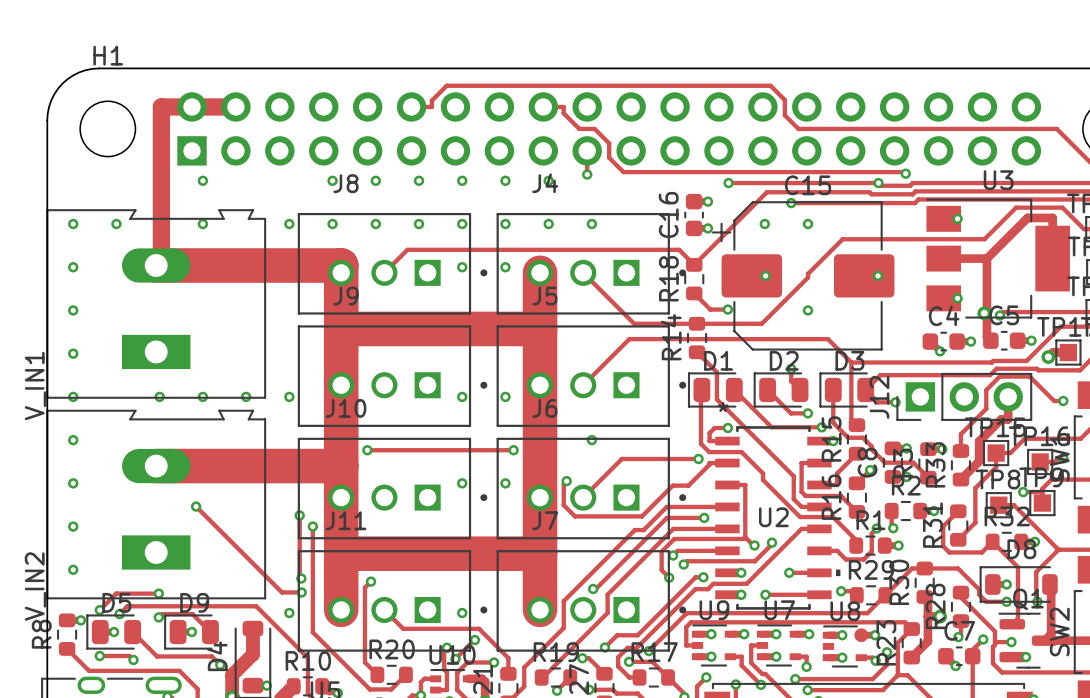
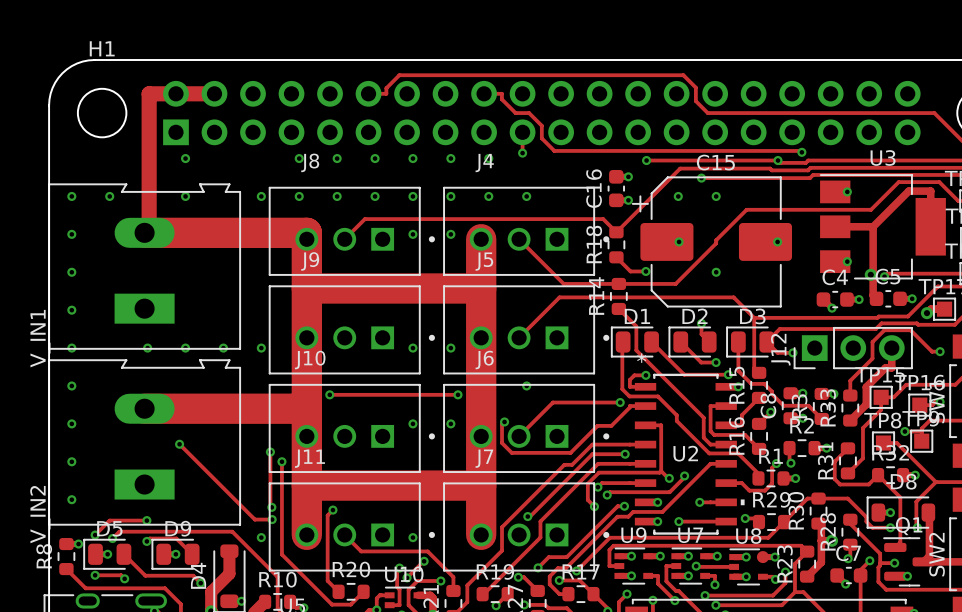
track: none -> (696, 566) (734, 566)
via: none -> (696, 566)

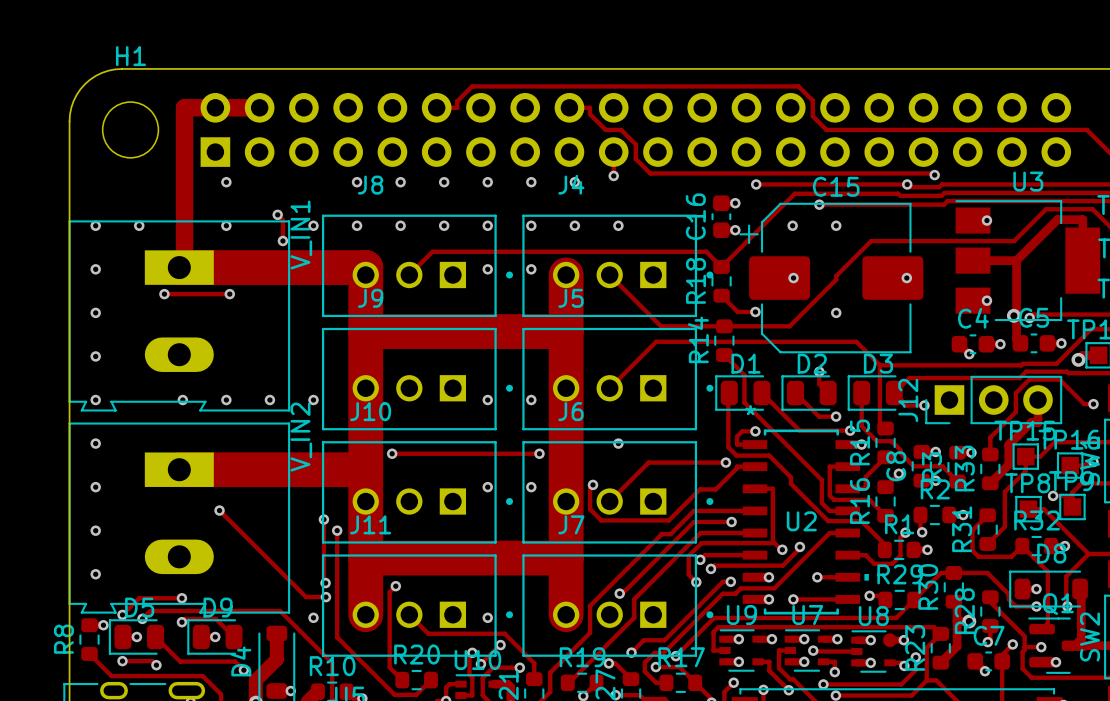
track: none -> (277, 214) (282, 220) (282, 240)
via: none -> (277, 214)
via: none -> (282, 240)
track: none -> (164, 294) (229, 294)
via: none -> (164, 294)
via: none -> (229, 294)
V_IN1 rotation: 0° (144, 266) -> 180° (179, 315)
V_IN2 rotation: 0° (144, 442) -> 180° (179, 518)

